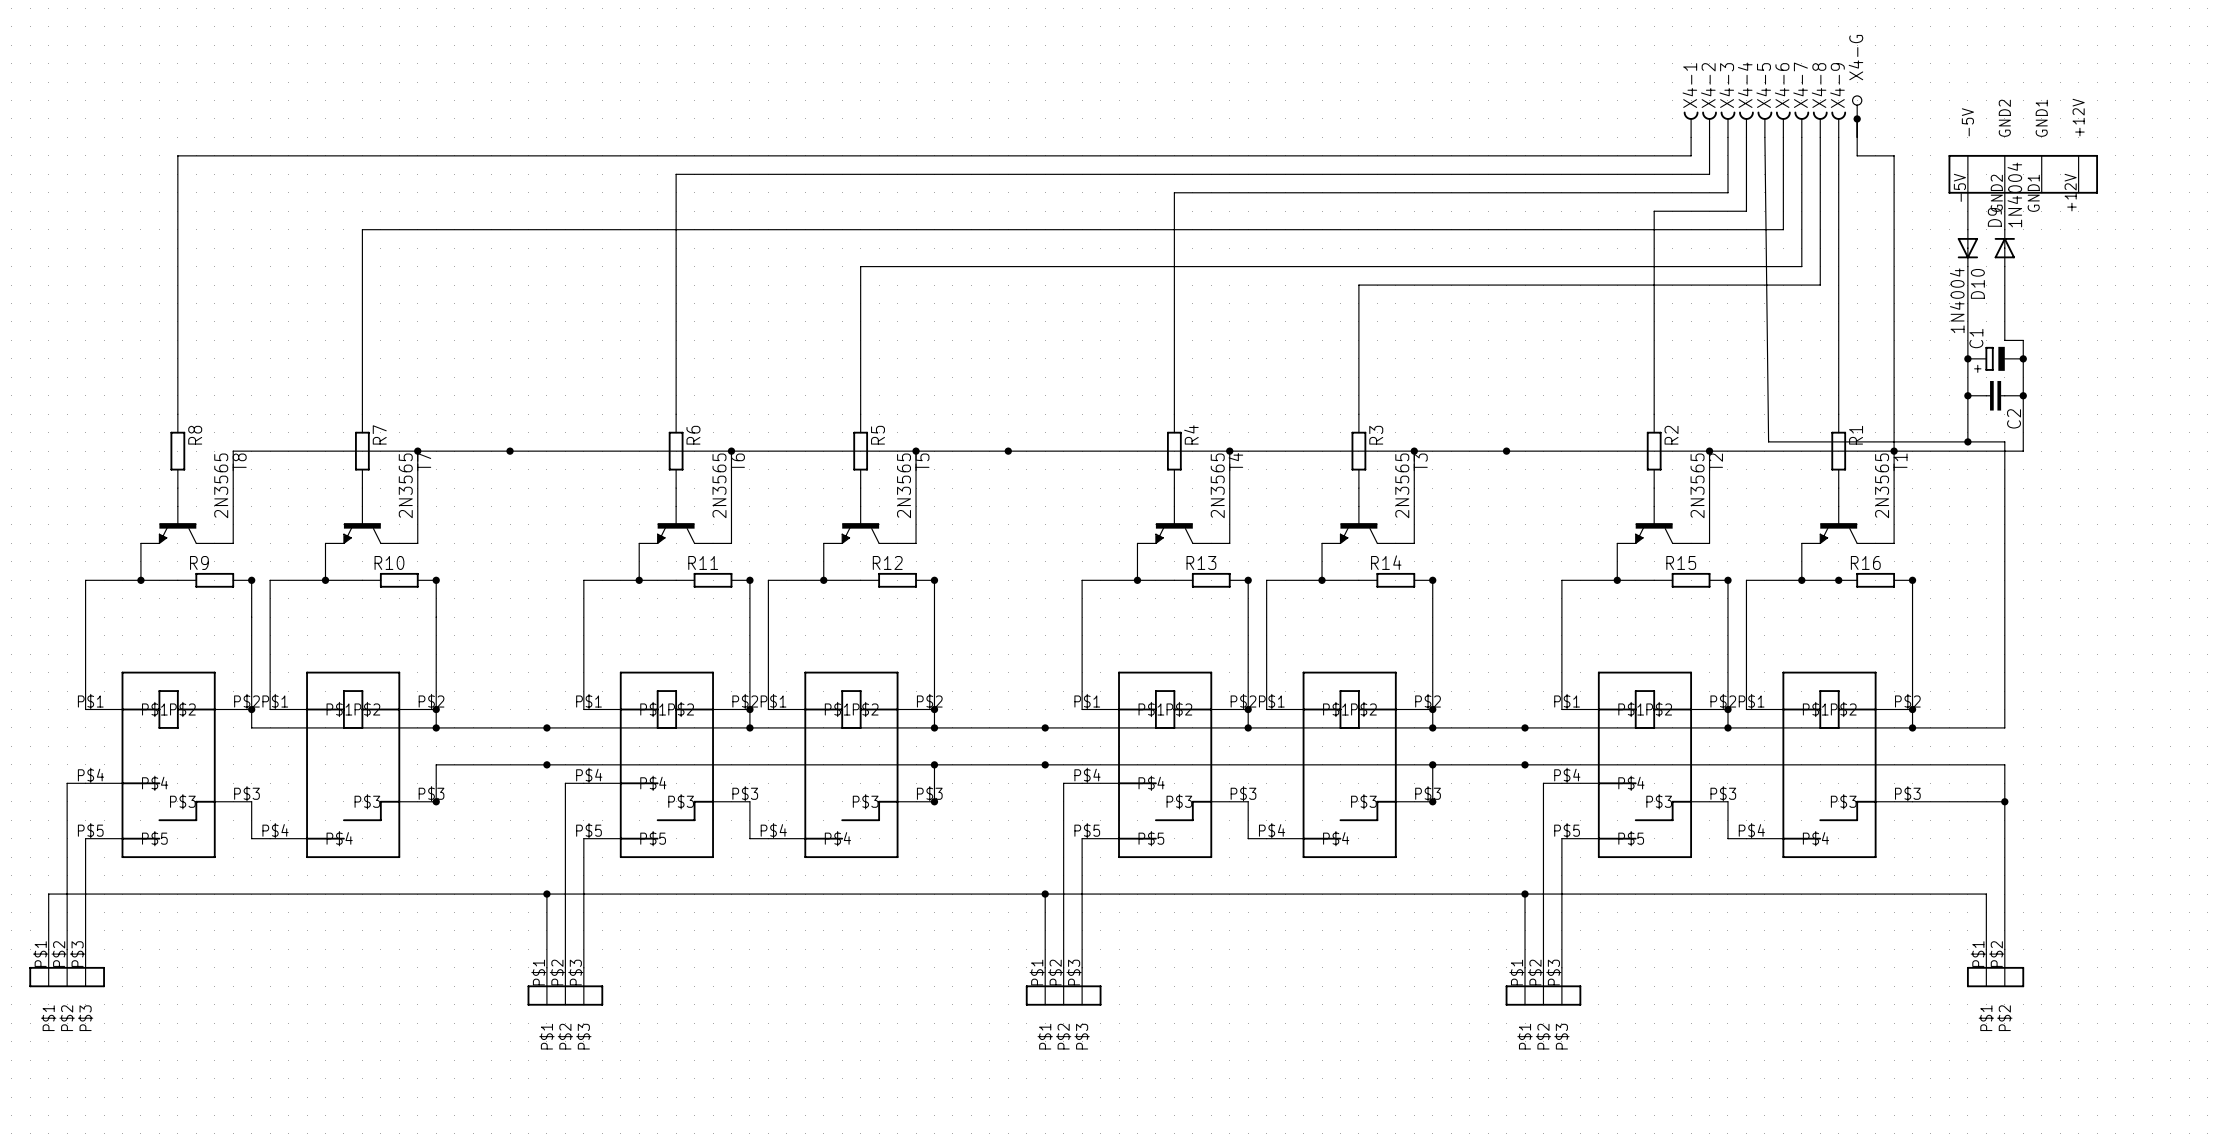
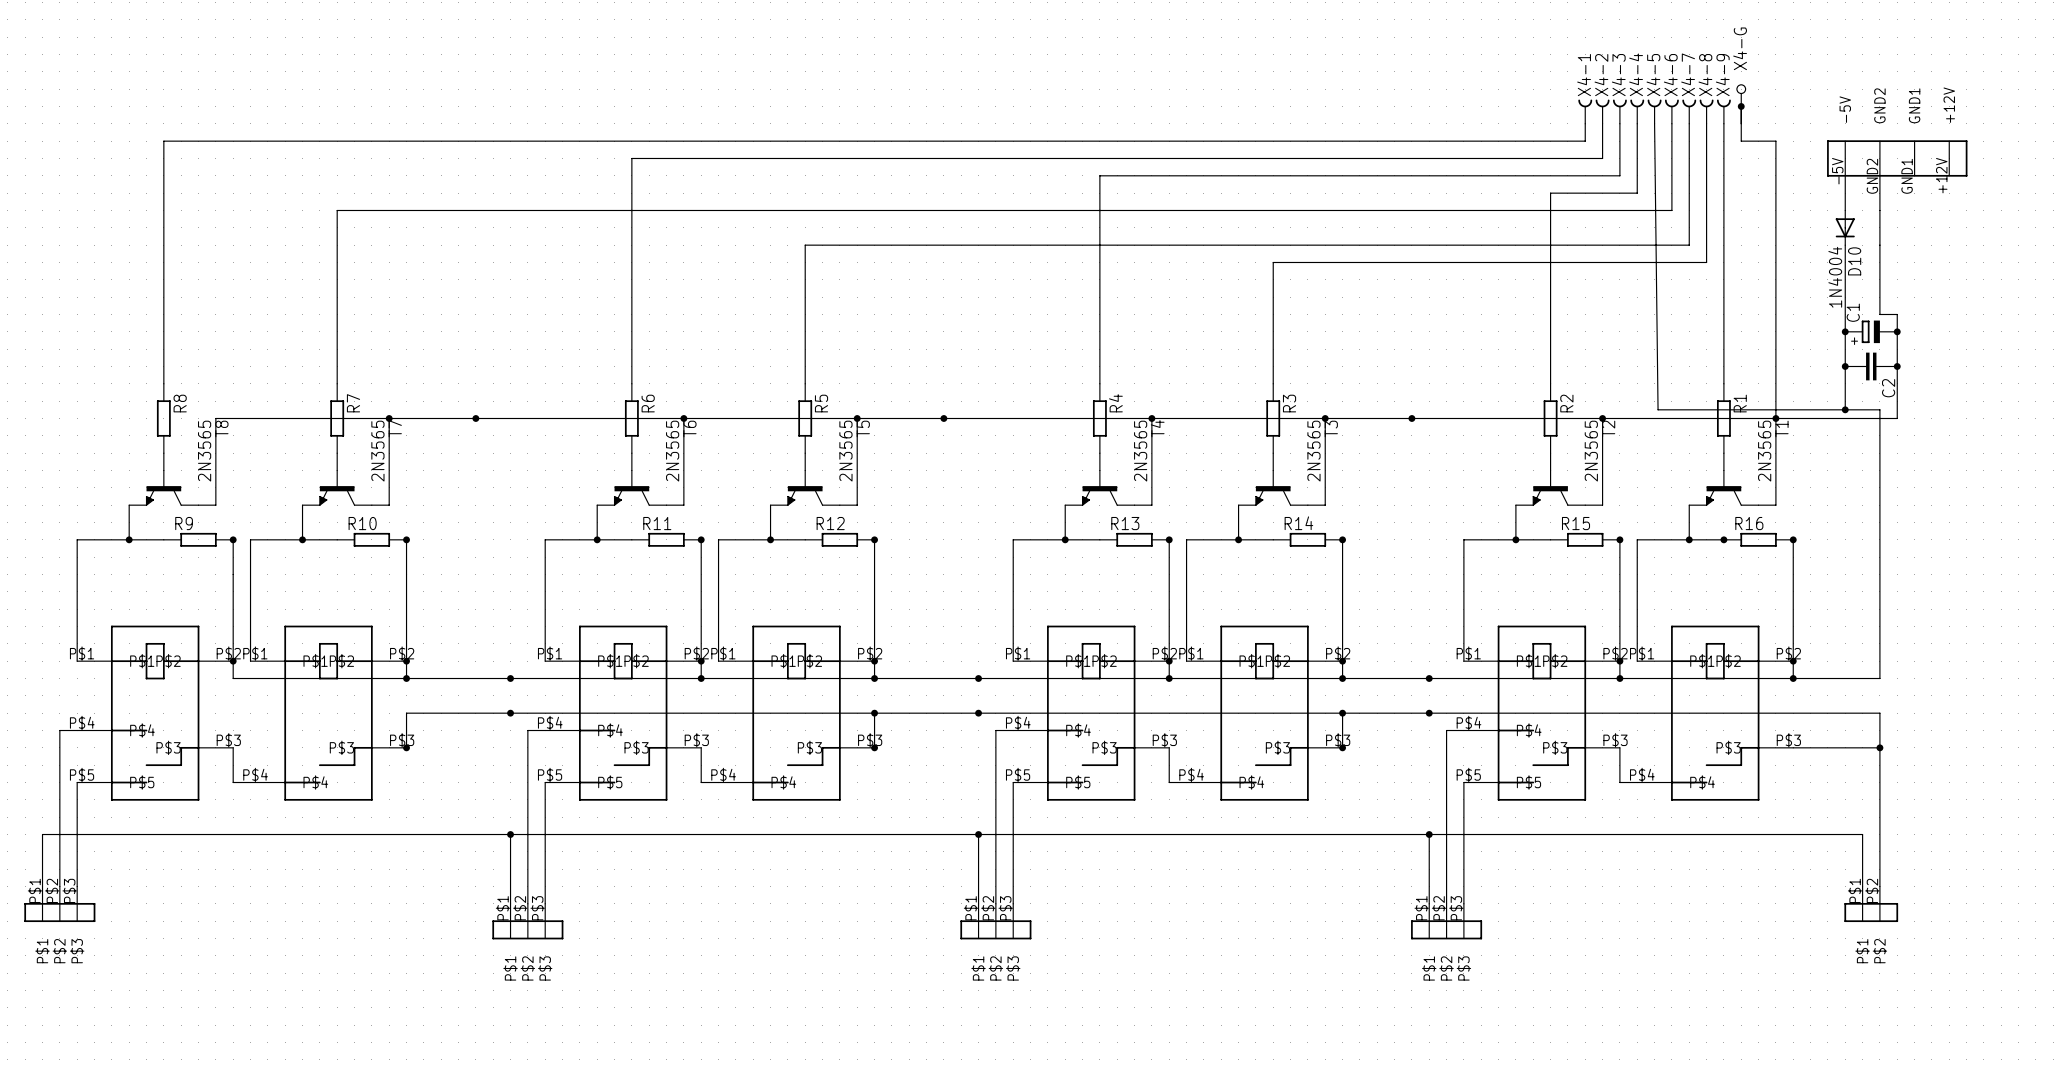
D9: 1N4004 (2004, 248) -> none

